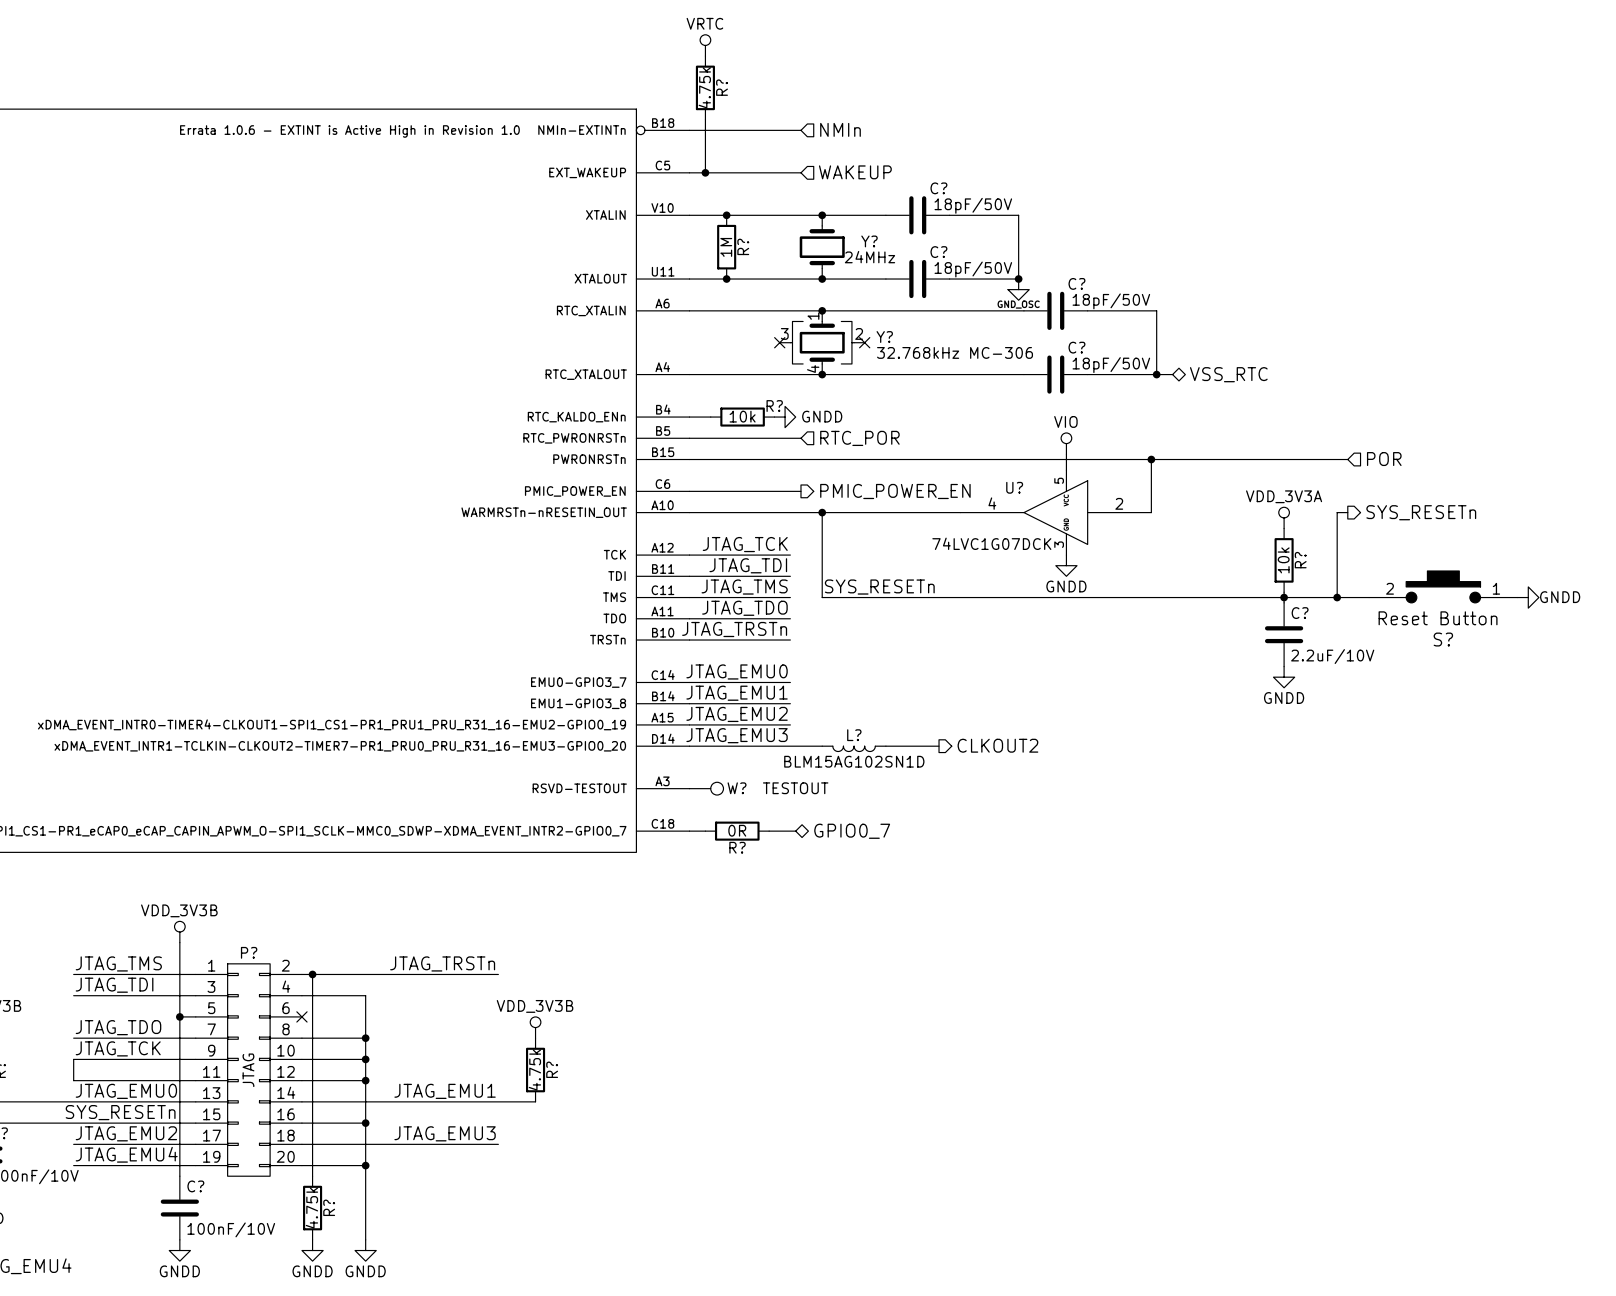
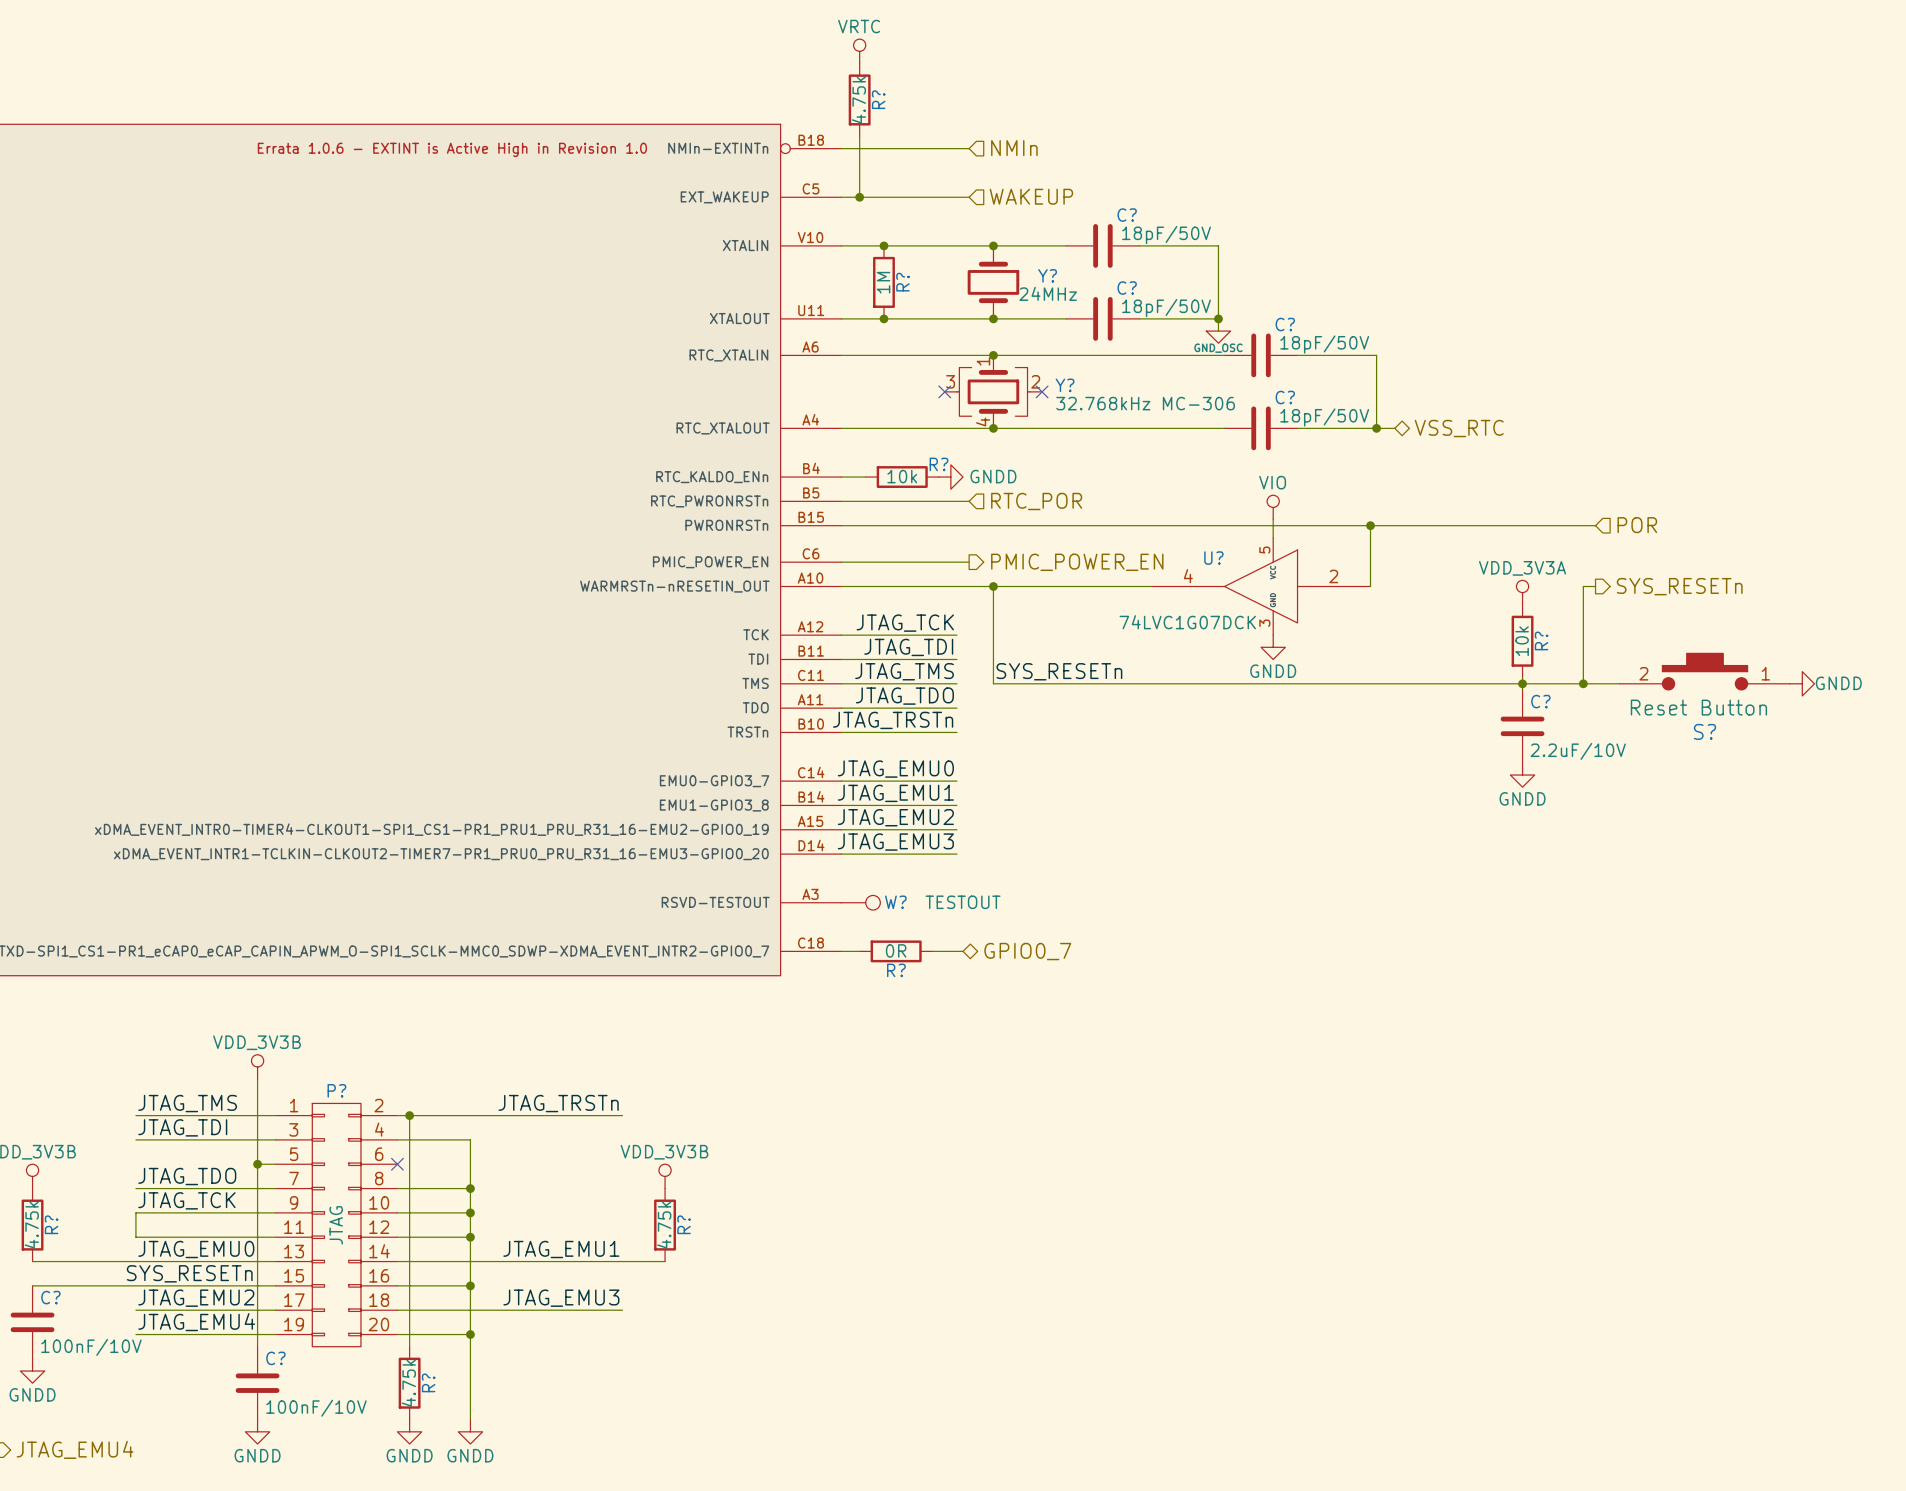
hierarchical label: CLKOUT2 (997, 745) -> none
wire: (790, 746) (822, 746) -> none
wire: (885, 746) (939, 746) -> none
L?: BLM15AG102SN1D (854, 748) -> none

